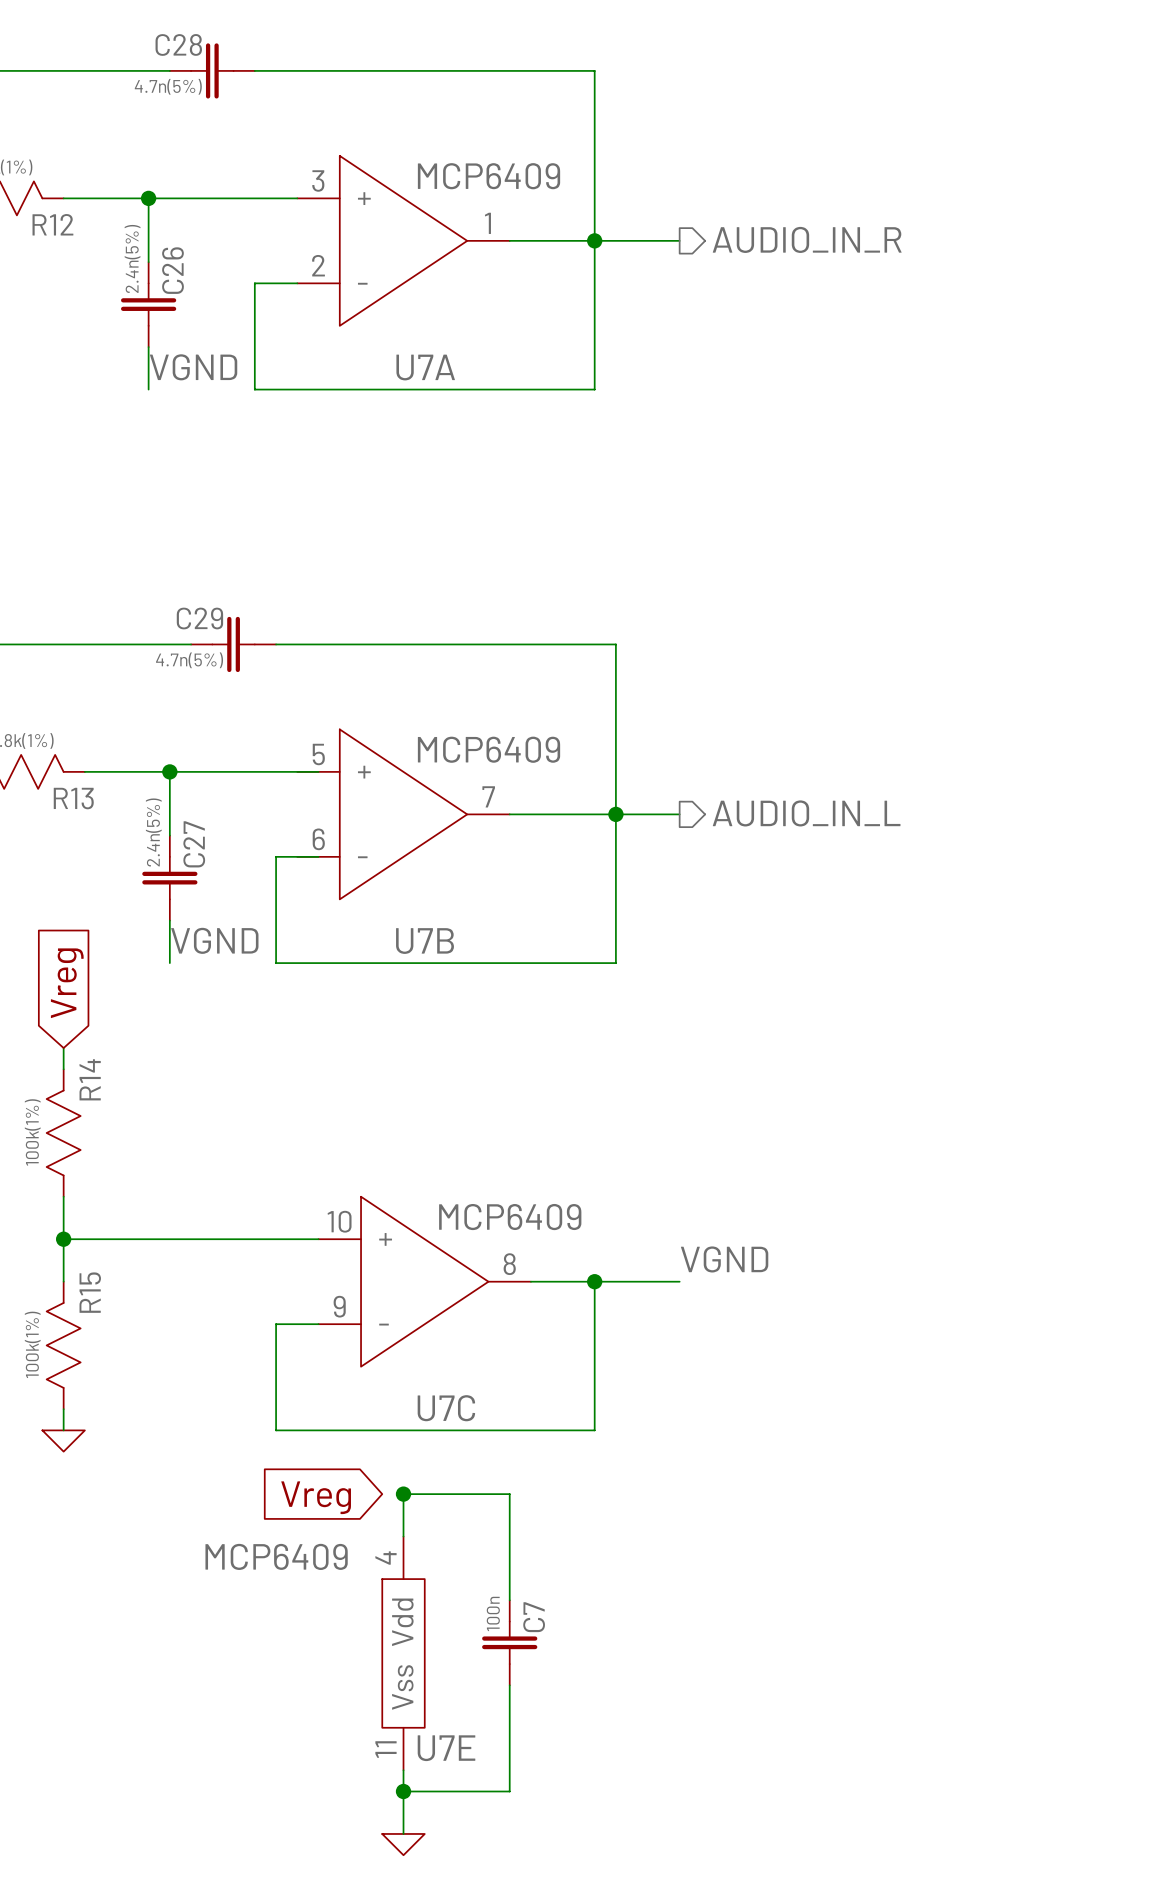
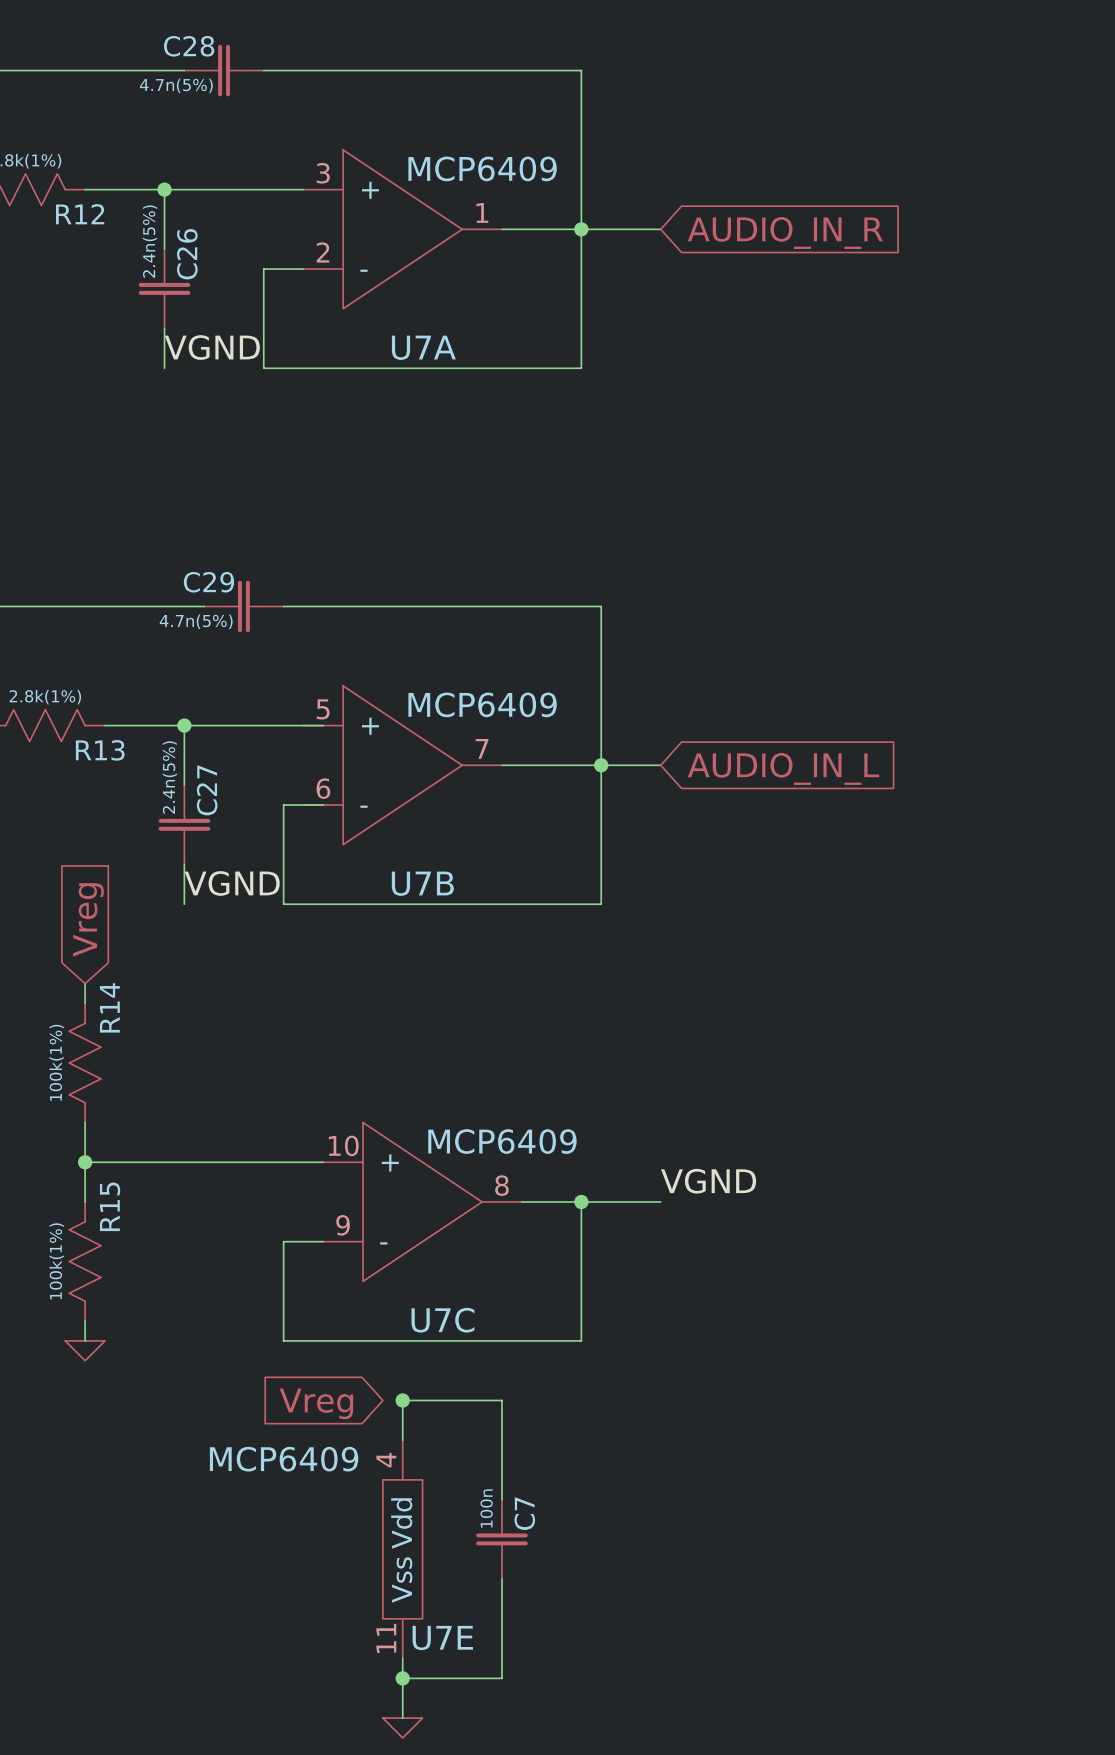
hierarchical label: AUDIO_IN_R (807, 239) -> none
global label: none -> AUDIO_IN_R (785, 232)
hierarchical label: AUDIO_IN_L (806, 813) -> none
global label: none -> AUDIO_IN_L (783, 768)

